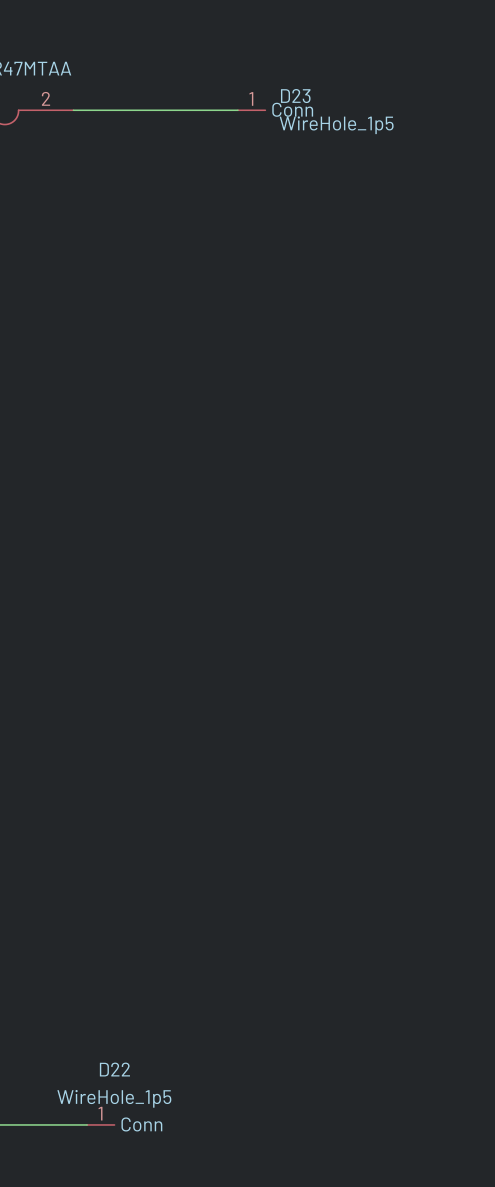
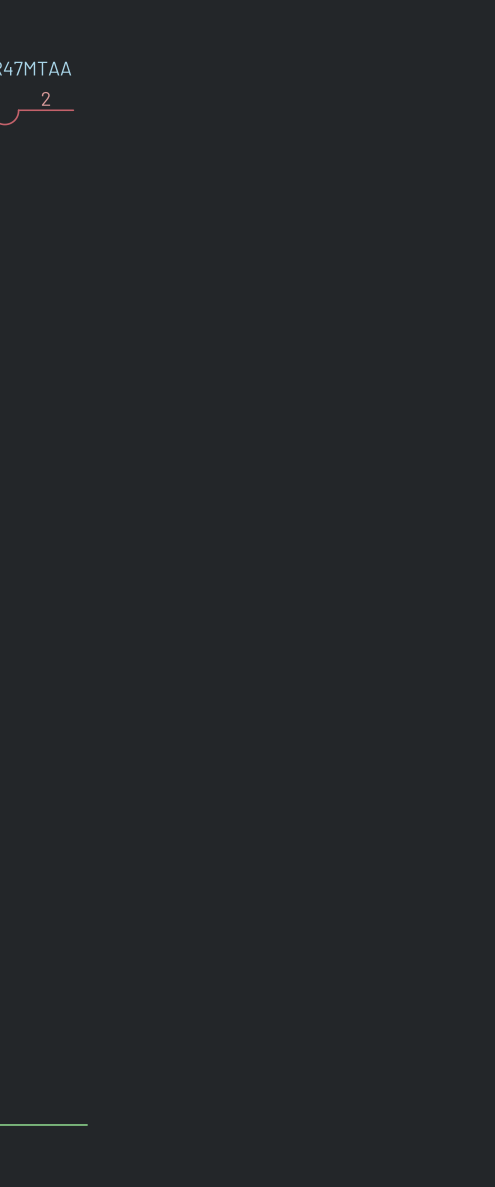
wire: (73, 110) (237, 110) -> none
D23: WireHole_1p5 (251, 110) -> none
D22: WireHole_1p5 (100, 1124) -> none

